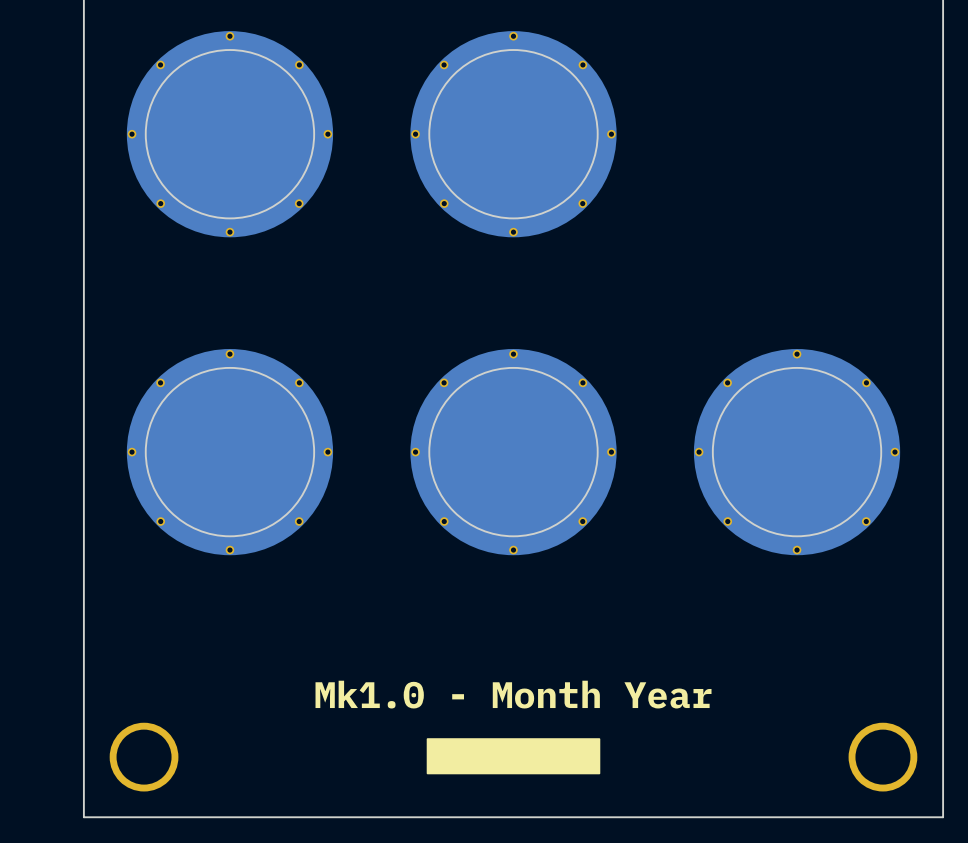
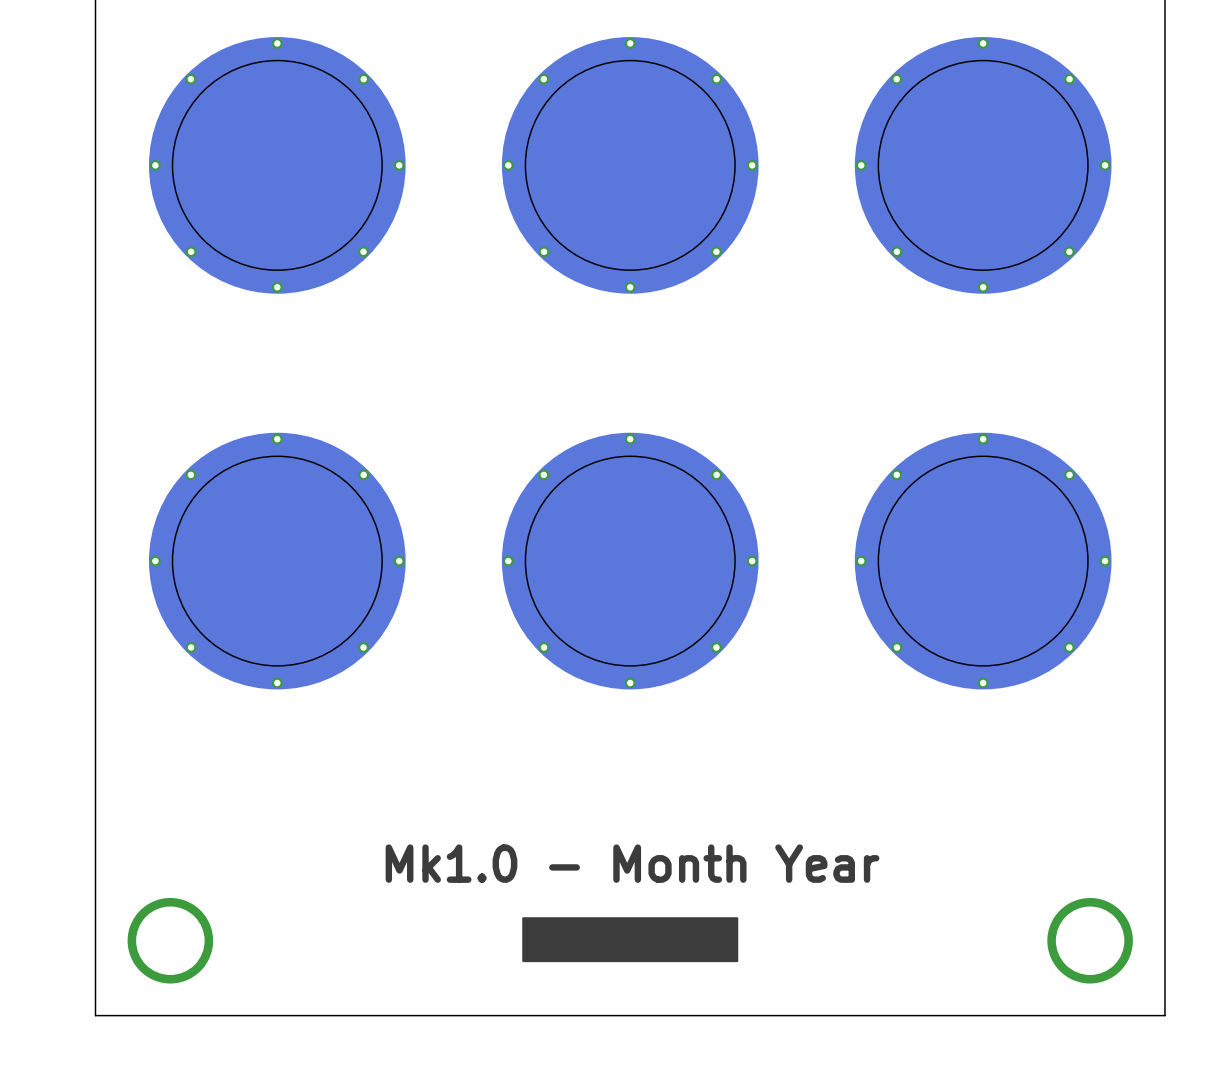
part: none -> (983, 165)

